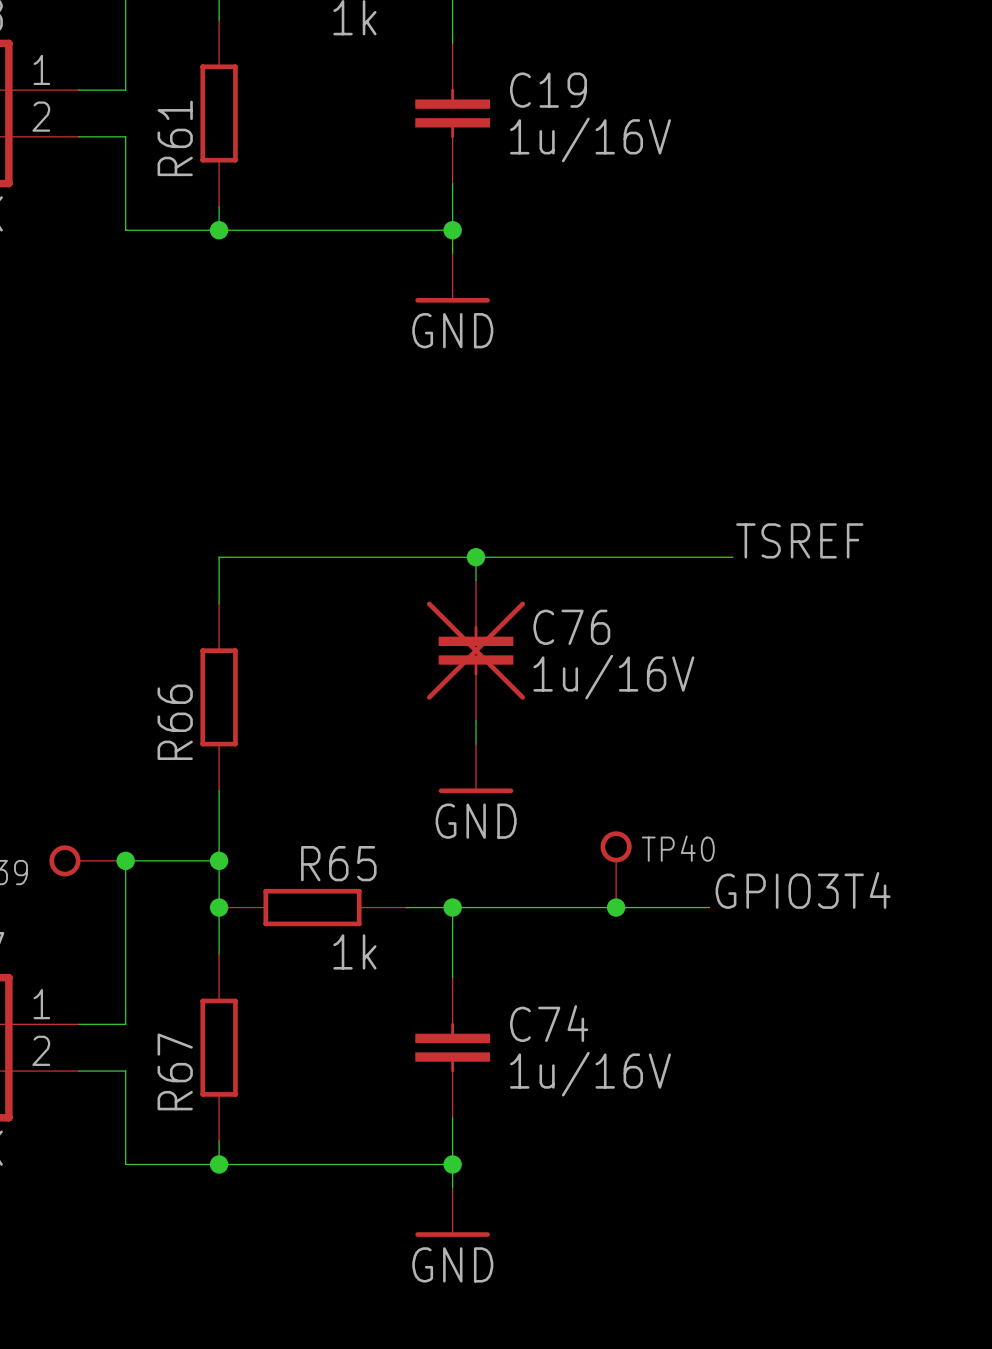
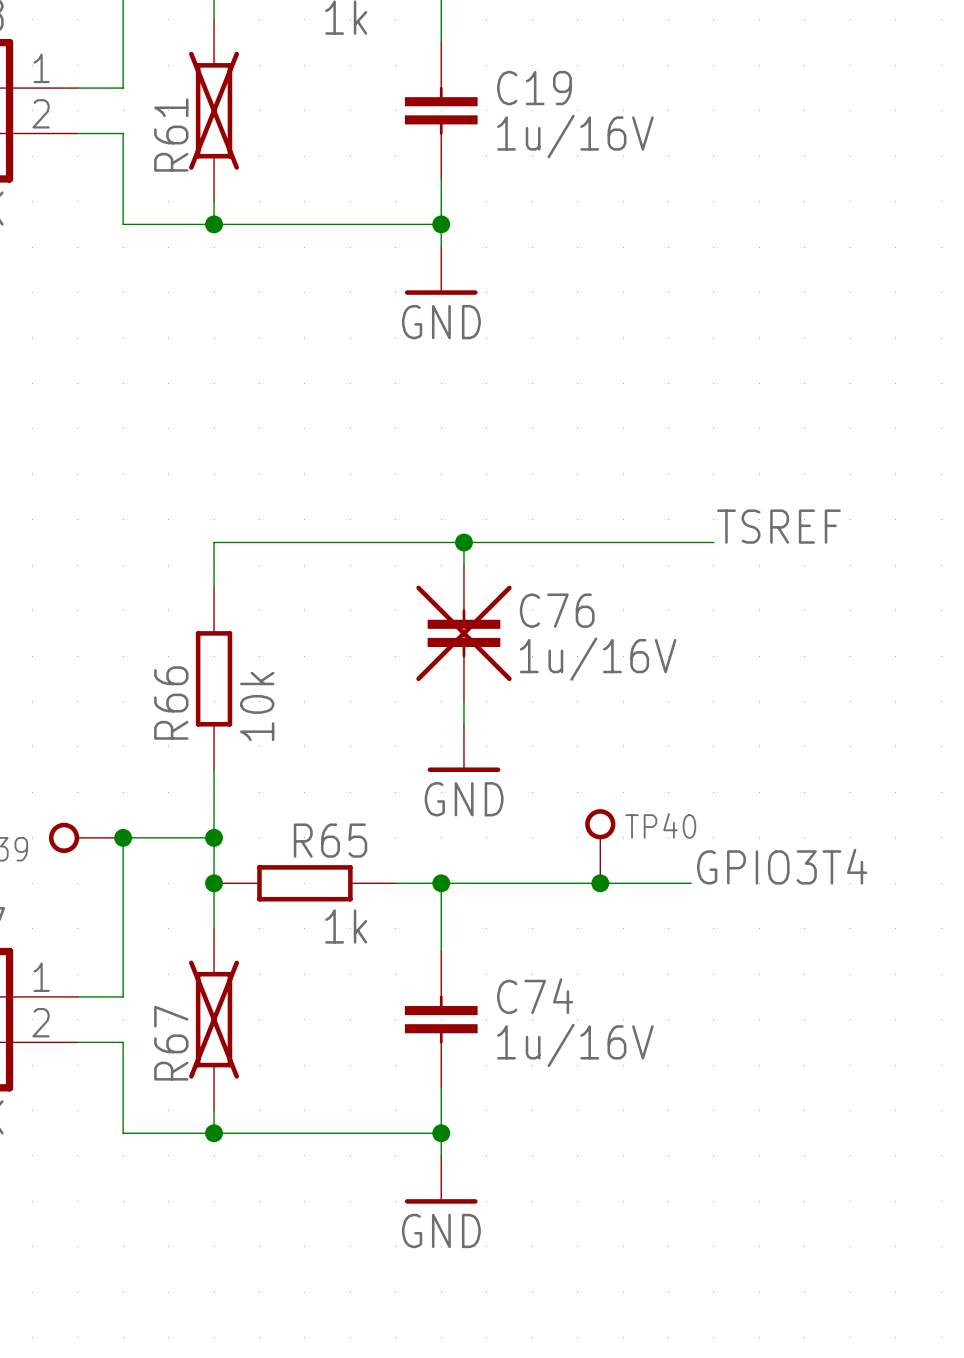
R61 symbol: [200, 20, 238, 207] -> [189, 19, 240, 202]
R66 value: none -> 10k (257, 706)
R67 symbol: [200, 954, 238, 1142] -> [189, 928, 240, 1111]

